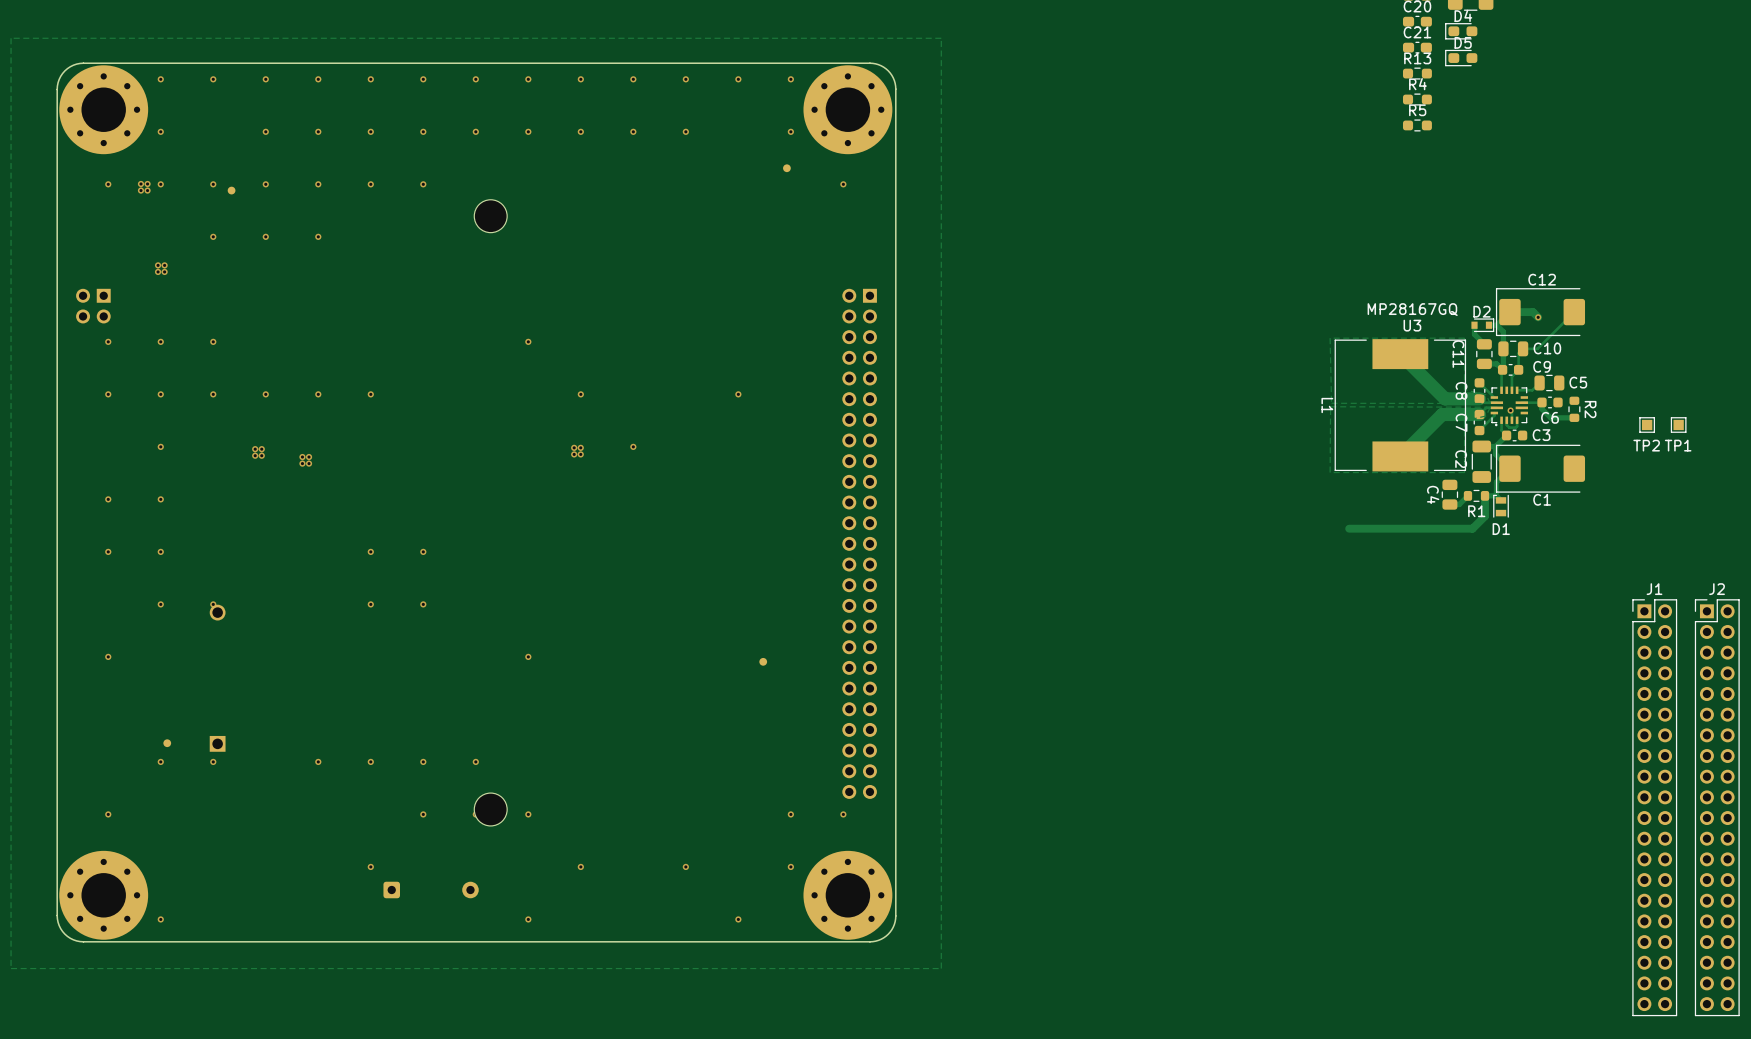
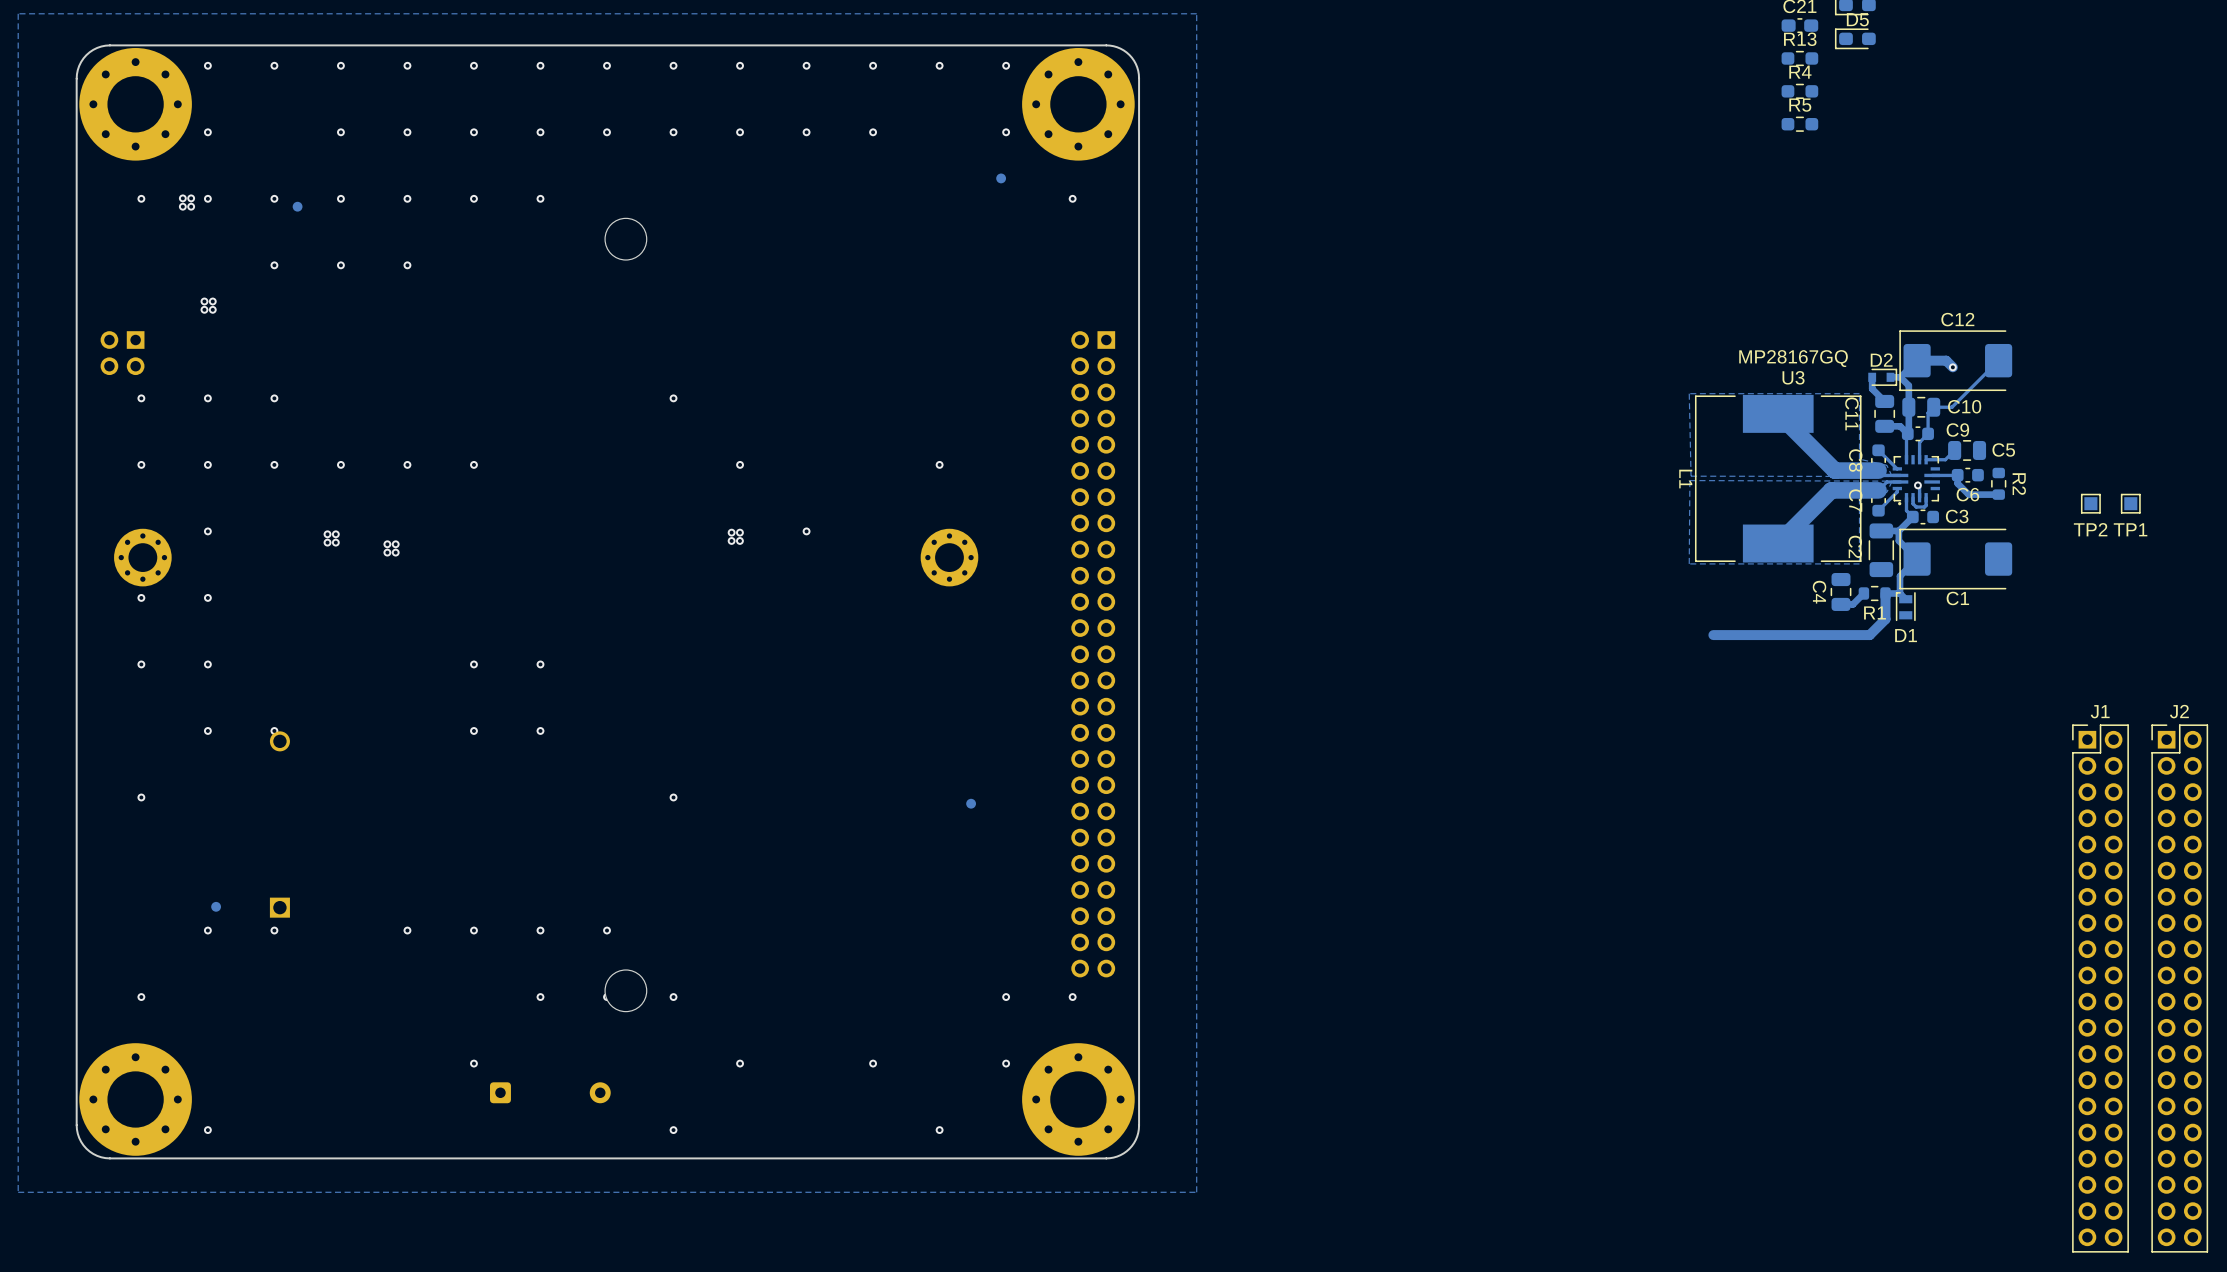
part: none -> (142, 557)
part: none -> (949, 557)

